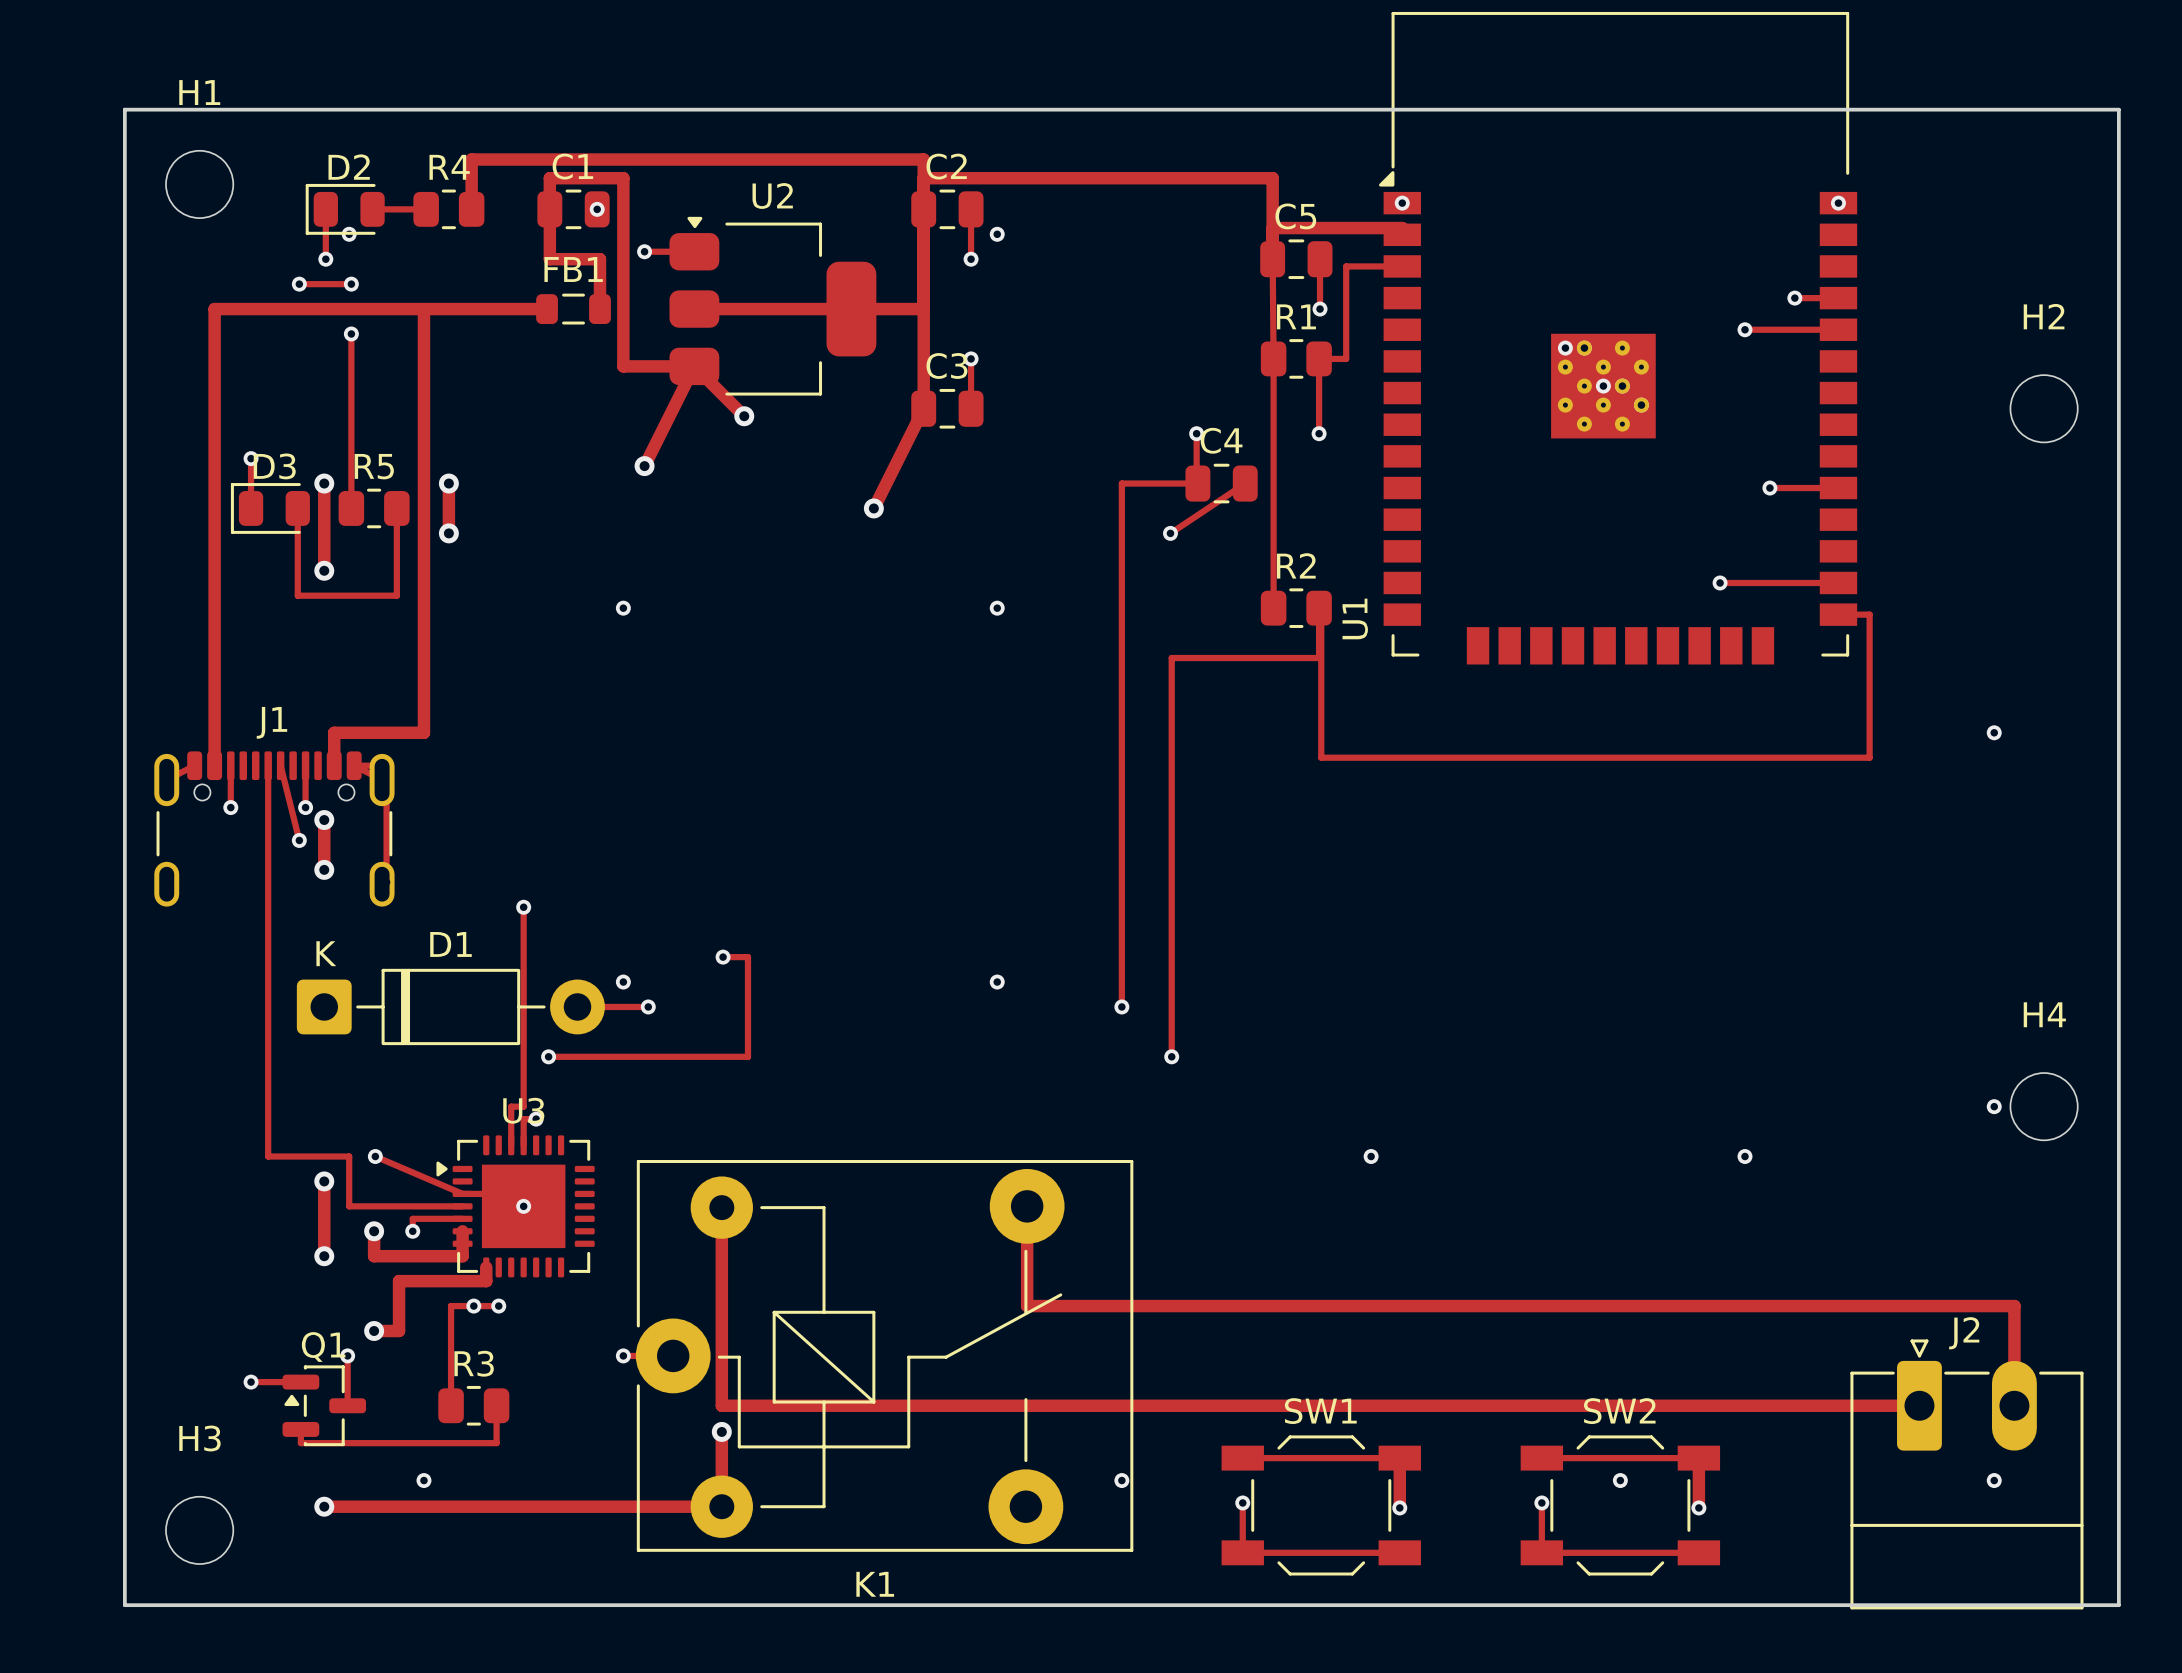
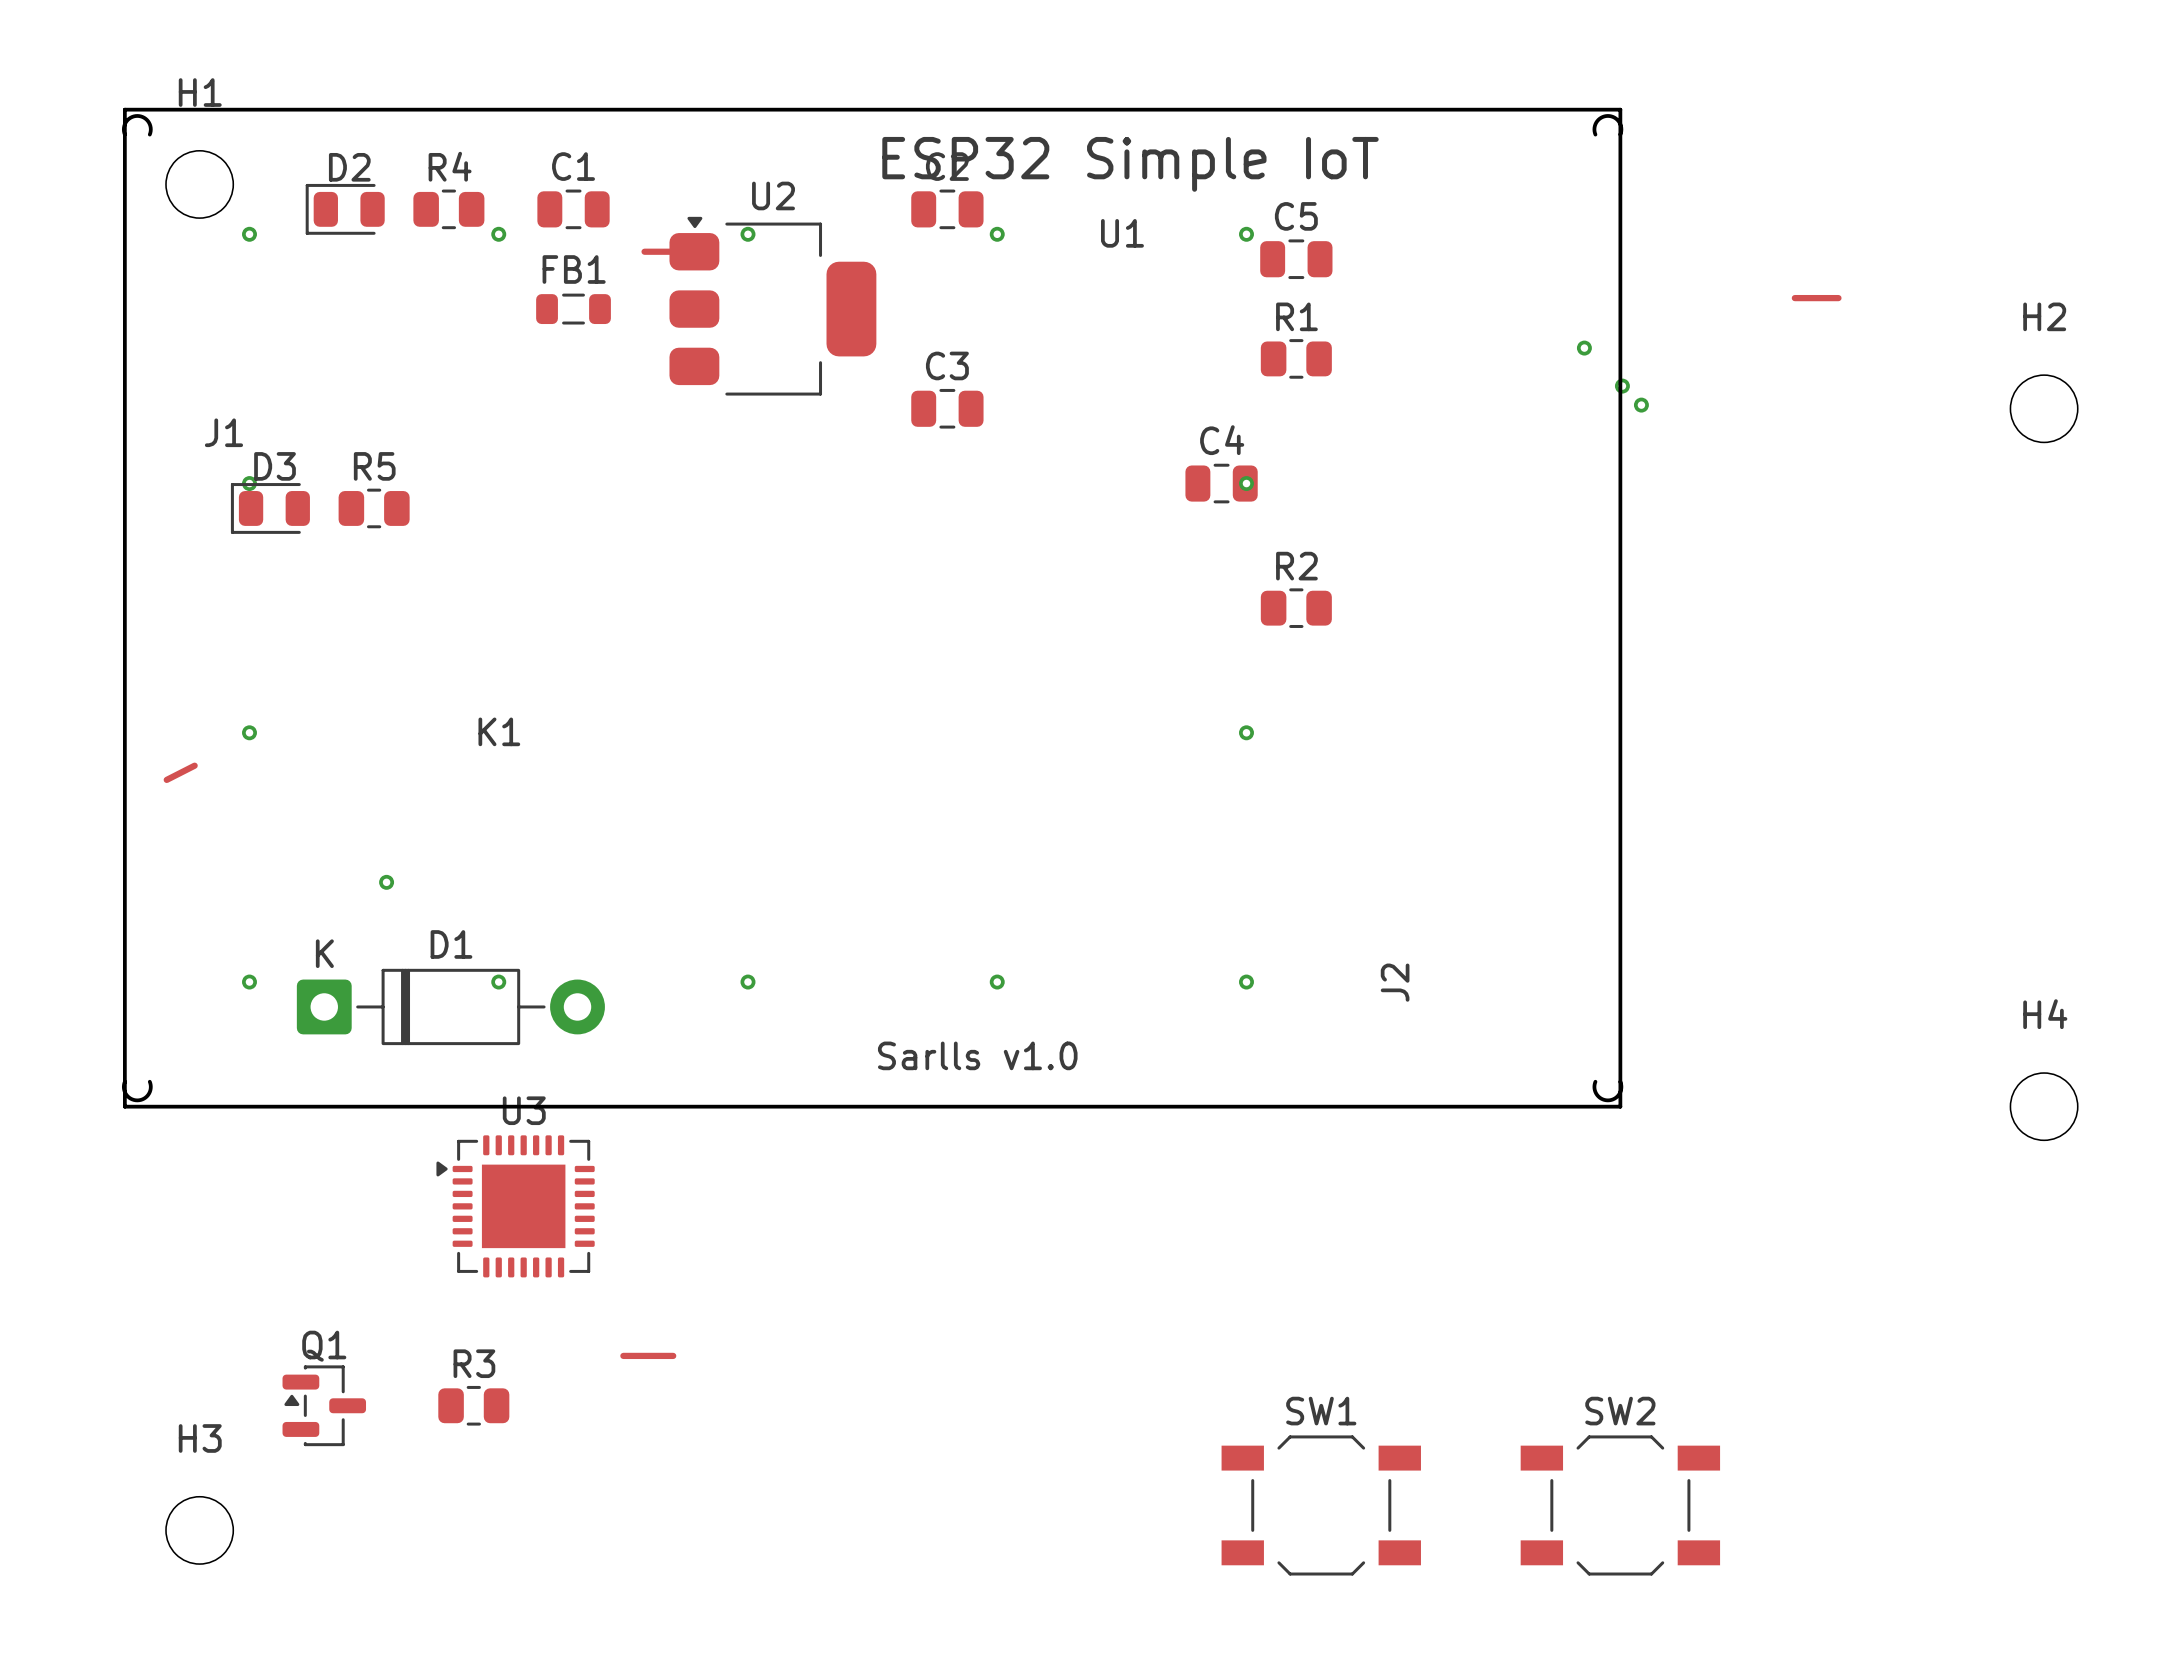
U1 footprint: [1378, 11, 1858, 665] -> [1101, 219, 1144, 248]
board edge: (1620, 109) (2118, 109) (2118, 1605) (124, 1605) (124, 1106) -> (1620, 109) (1620, 1106) (124, 1106)
board edge: none -> (124, 134) (123, 127) (126, 121) (137, 115) (148, 121) (150, 127) (149, 134)
board edge: none -> (1595, 134) (1596, 122) (1601, 117) (1607, 115) (1618, 121) (1621, 127) (1620, 134)
text: none -> ESP32 Simple IoT (1130, 164)
track: (923, 178) (1272, 178) (1273, 608) -> none
via: (1402, 203) -> none
via: (1838, 203) -> none
track: (325, 209) (325, 259) -> none
track: (372, 209) (426, 209) -> none
track: (471, 209) (471, 159) (923, 159) (923, 408) (873, 508) -> none
via: (597, 209) -> none
track: (971, 209) (971, 259) -> none
track: (1272, 228) (1402, 228) (1402, 234) -> none
via: none -> (249, 234)
via: (349, 234) -> none
via: none -> (498, 234)
via: none -> (747, 234)
via: none -> (1246, 234)
via: (644, 251) -> none
via: (325, 259) -> none
via: (971, 259) -> none
track: (1320, 259) (1320, 309) -> none
track: (1402, 266) (1346, 266) (1346, 358) (1319, 358) (1319, 433) -> none
track: (299, 284) (351, 284) -> none
via: (299, 284) -> none
via: (351, 284) -> none
via: (1794, 298) -> none
track: (423, 309) (423, 732) (334, 732) (334, 765) -> none
track: (547, 309) (214, 309) (214, 765) -> none
track: (600, 309) (600, 259) (549, 259) (549, 178) (623, 178) (623, 366) (694, 366) -> none
track: (694, 309) (923, 309) -> none
via: (1320, 309) -> none
track: (1744, 329) (1838, 329) -> none
via: (1744, 329) -> none
track: (351, 333) (351, 508) -> none
via: (351, 333) -> none
via: (1565, 348) -> none
track: (971, 358) (971, 408) -> none
via: (971, 358) -> none
track: (694, 366) (644, 466) -> none
track: (694, 366) (744, 416) -> none
via: (1603, 386) -> none
via: (744, 416) -> none
track: (1196, 433) (1196, 483) -> none
via: (1196, 433) -> none
via: (1319, 433) -> none
track: (251, 458) (251, 508) -> none
via position: (251, 458) -> (249, 483)
via: (644, 466) -> none
track: (324, 483) (324, 570) -> none
via: (324, 483) -> none
track: (448, 483) (448, 533) -> none
via: (448, 483) -> none
track: (1197, 483) (1121, 483) (1121, 1006) -> none
track: (1245, 483) (1170, 533) -> none
via: none -> (1246, 483)
track: (1769, 488) (1838, 488) -> none
via: (1769, 488) -> none
track: (297, 508) (297, 595) (396, 595) (396, 508) -> none
via: (873, 508) -> none
via: (448, 533) -> none
via: (1170, 533) -> none
via: (324, 570) -> none
track: (1720, 582) (1838, 582) -> none
via: (1720, 582) -> none
via: (623, 608) -> none
via: (997, 608) -> none
track: (1838, 614) (1869, 614) (1869, 757) (1321, 757) (1321, 608) (1319, 608) (1319, 658) (1171, 658) (1171, 1056) -> none
U1 name position: U1 (1355, 618) -> U1 (1122, 233)
J1 name position: J1 (271, 722) -> J1 (223, 432)
via: none -> (249, 732)
via: none -> (1246, 732)
via: (1994, 732) -> none
J1 footprint: [154, 751, 395, 907] -> [204, 418, 244, 448]
track: (230, 765) (230, 807) -> none
track: (268, 765) (268, 1156) (349, 1156) (349, 1206) (462, 1206) -> none
track: (280, 765) (299, 840) -> none
track: (305, 765) (305, 807) -> none
track: (382, 779) (354, 765) (386, 765) (386, 882) -> none
via: (230, 807) -> none
via: (305, 807) -> none
track: (324, 820) (324, 869) -> none
via: (324, 820) -> none
via: (299, 840) -> none
via: (324, 869) -> none
track: (523, 907) (523, 1106) (511, 1106) (511, 1145) -> none
via: (523, 907) -> none
track: (723, 957) (747, 957) (747, 1056) (548, 1056) -> none
via position: (723, 957) -> (747, 982)
via: none -> (249, 982)
via: none -> (498, 982)
via: (623, 982) -> none
via: none -> (1246, 982)
track: (577, 1006) (648, 1006) -> none
via: (648, 1006) -> none
via: (1121, 1006) -> none
text: none -> Sarlls v1.0 (977, 1055)
via: (548, 1056) -> none
via: (1171, 1056) -> none
board edge: none -> (124, 1081) (123, 1088) (126, 1095) (137, 1100) (148, 1095) (150, 1088) (149, 1081)
board edge: none -> (1595, 1081) (1594, 1088) (1597, 1095) (1607, 1100) (1618, 1095) (1621, 1088) (1620, 1081)
via: (1994, 1106) -> none
track: (536, 1119) (523, 1119) (523, 1145) -> none
via: (536, 1119) -> none
track: (375, 1156) (462, 1193) (523, 1193) (523, 1206) -> none
via: (375, 1156) -> none
via: (1371, 1156) -> none
via: (1744, 1156) -> none
K1 footprint: [635, 1160, 1134, 1552] -> [478, 717, 521, 747]
track: (324, 1181) (324, 1256) -> none
via: (324, 1181) -> none
via: (523, 1206) -> none
track: (1027, 1206) (1027, 1306) (2014, 1306) (2014, 1405) -> none
track: (721, 1207) (721, 1405) (1919, 1405) -> none
track: (462, 1218) (412, 1218) (412, 1231) -> none
track: (374, 1231) (374, 1256) (462, 1256) (462, 1231) -> none
via: (374, 1231) -> none
via: (412, 1231) -> none
via: (324, 1256) -> none
track: (486, 1267) (486, 1281) (399, 1281) (399, 1330) (374, 1330) -> none
via: (473, 1306) -> none
track: (498, 1306) (451, 1306) (451, 1405) -> none
via: (498, 1306) -> none
via: (374, 1330) -> none
J2 name position: J2 (1964, 1333) -> J2 (1395, 982)
J2 footprint: [1850, 1339, 2084, 1610] -> [1380, 963, 1410, 1002]
track: (347, 1355) (347, 1405) -> none
via: (347, 1355) -> none
via: (623, 1355) -> none
track: (251, 1382) (300, 1382) -> none
via: (251, 1382) -> none
track: (496, 1405) (496, 1443) (300, 1443) (300, 1429) -> none
track: (721, 1431) (721, 1506) (324, 1506) -> none
via: (721, 1431) -> none
track: (1242, 1458) (1399, 1458) (1399, 1507) -> none
track: (1541, 1458) (1698, 1458) (1698, 1507) -> none
via: (423, 1480) -> none
via: (1121, 1480) -> none
via: (1620, 1480) -> none
via: (1994, 1480) -> none
track: (1242, 1502) (1242, 1552) (1399, 1552) -> none
via: (1242, 1502) -> none
track: (1541, 1502) (1541, 1552) (1698, 1552) -> none
via: (1541, 1502) -> none
via: (324, 1506) -> none
via: (1399, 1507) -> none
via: (1698, 1507) -> none
K1 name position: K1 (875, 1584) -> K1 (499, 731)

